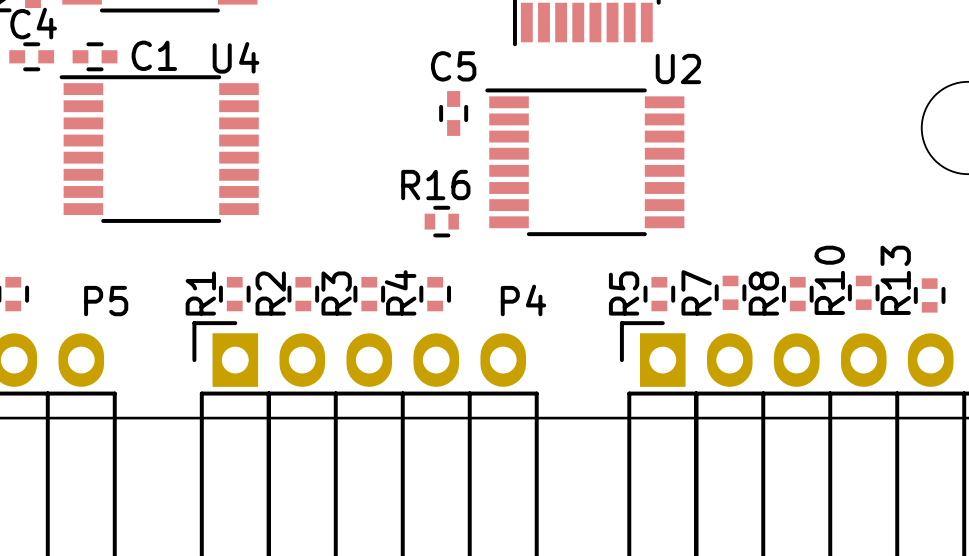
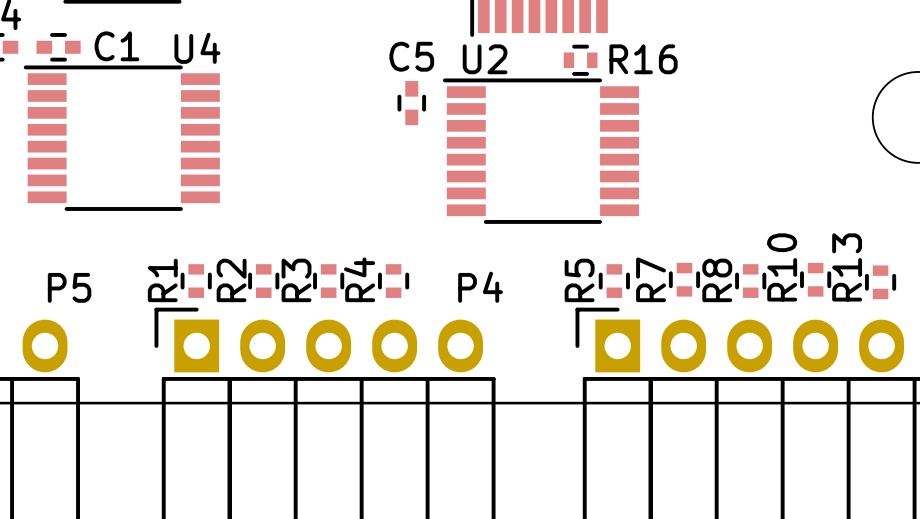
U2 name position: U2 (678, 68) -> U2 (485, 59)
R16 name position: R16 (435, 185) -> R16 (643, 59)
R16 position: (441, 221) -> (580, 60)

